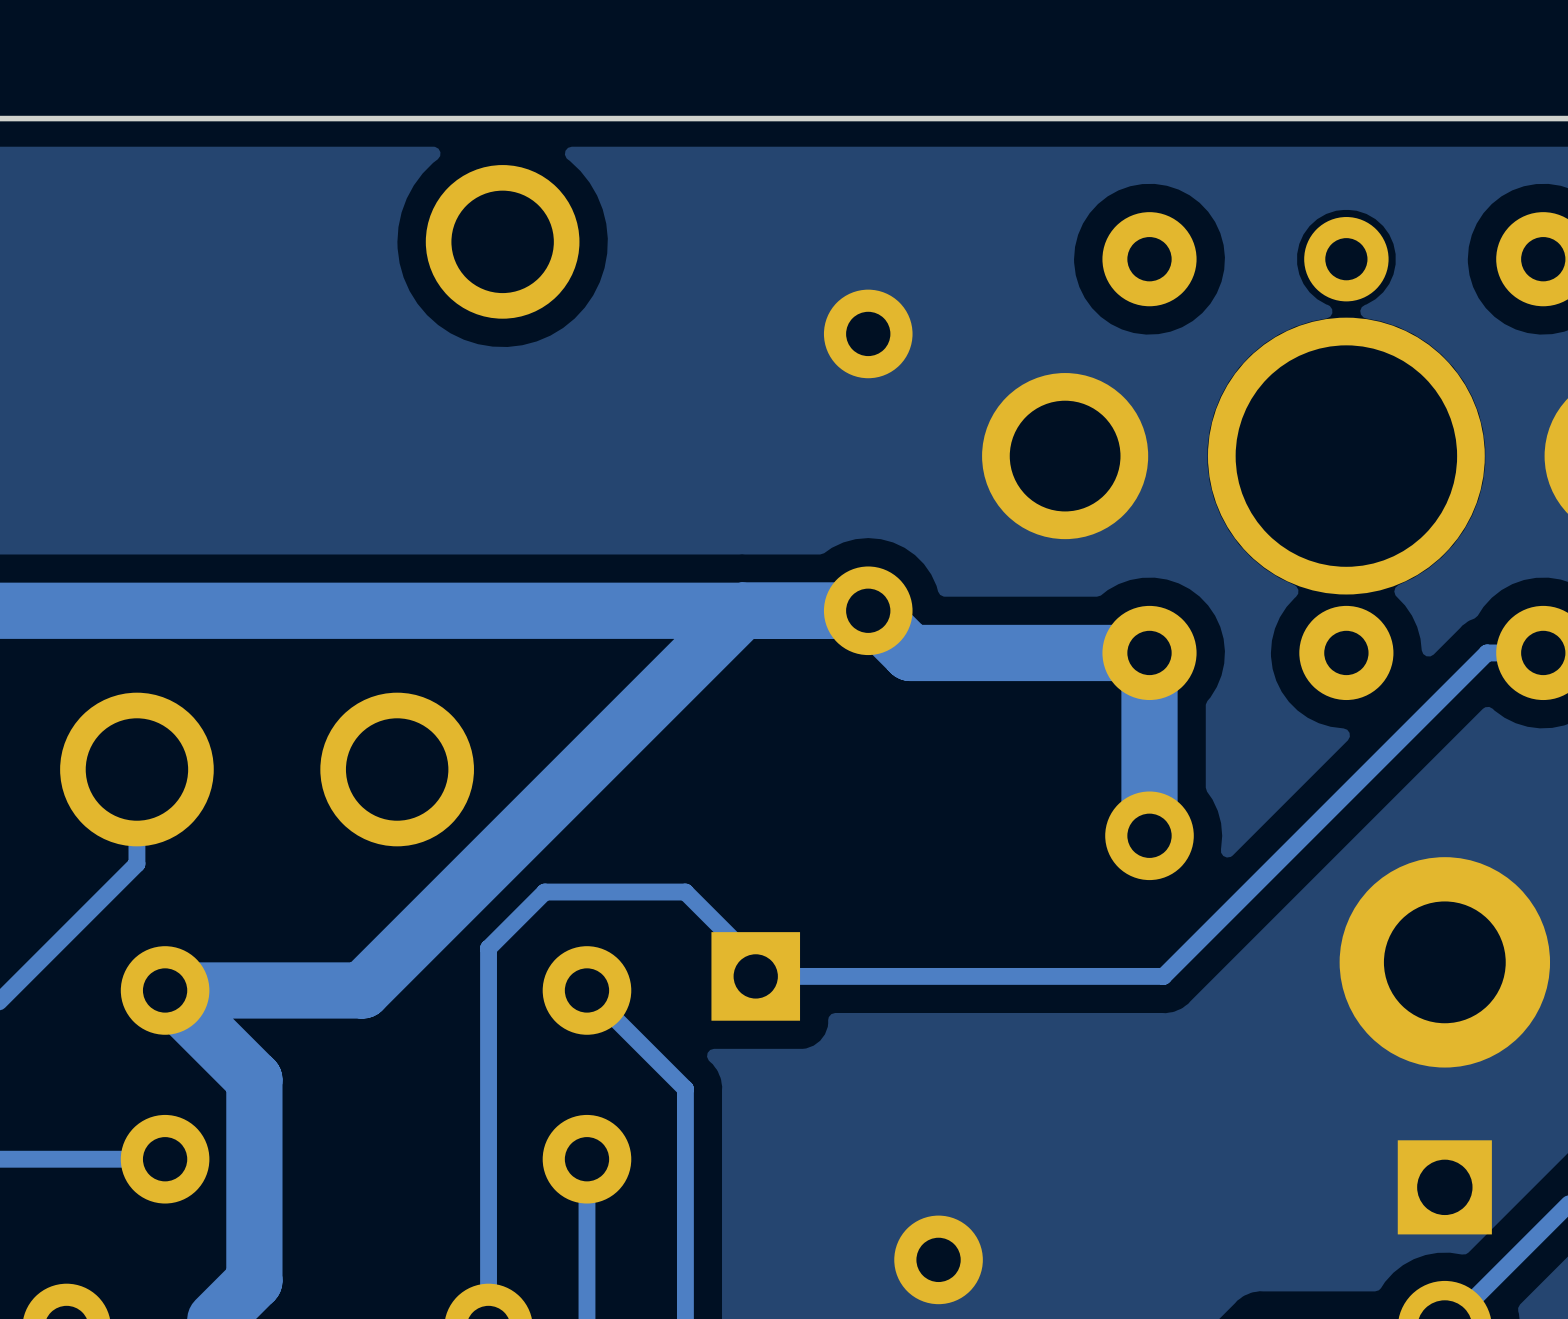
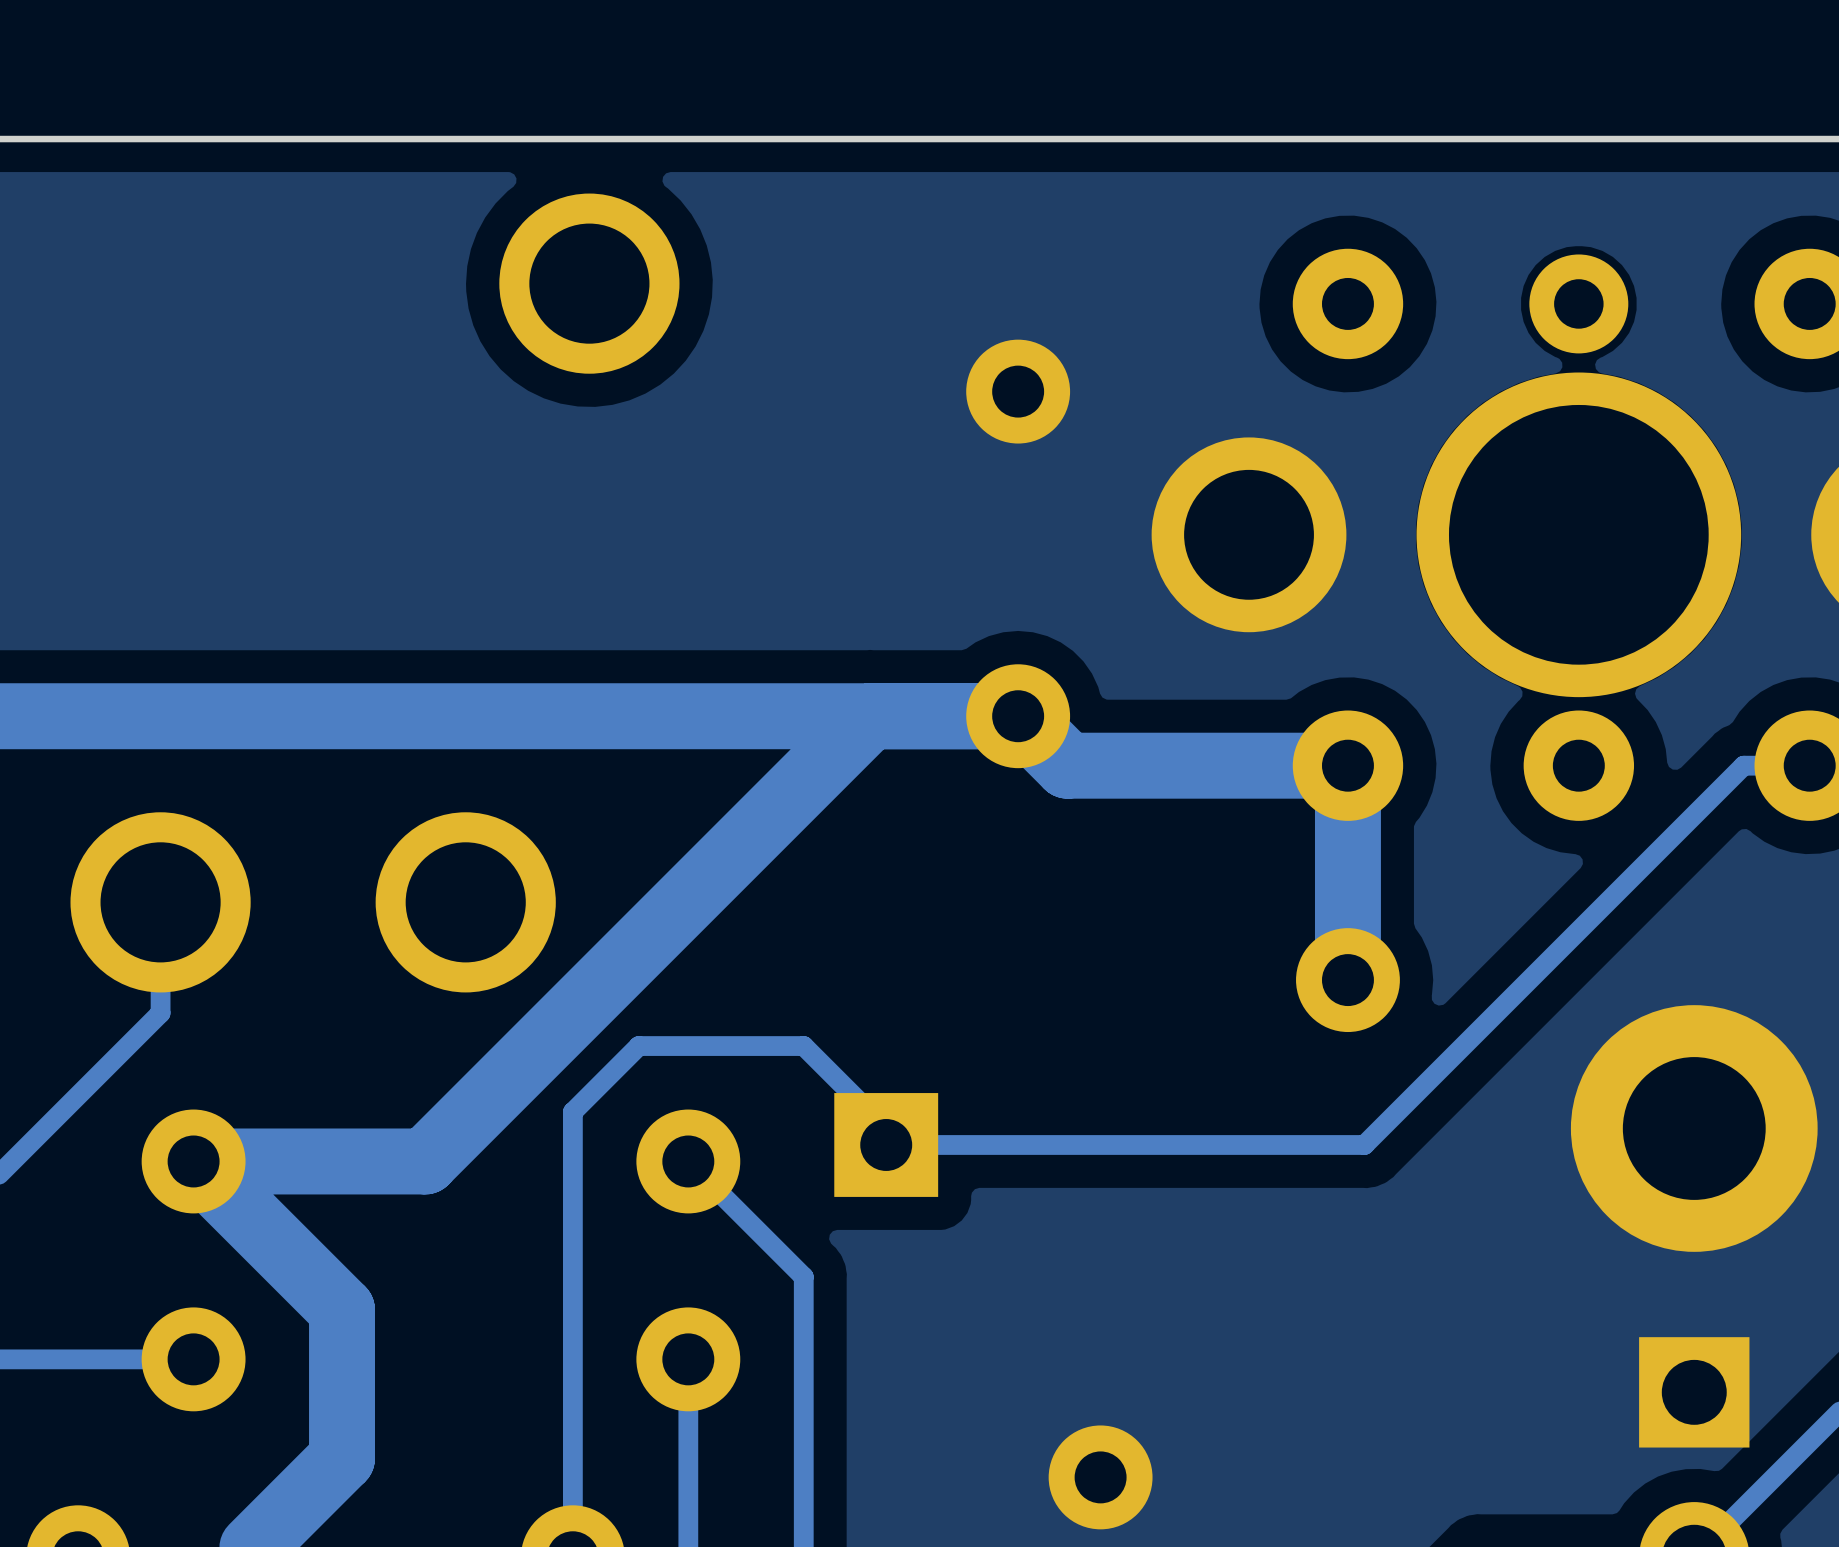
bottom track: (254, 1079) (254, 1280) -> (298, 1266) (342, 1309) (342, 1458) (298, 1502)

